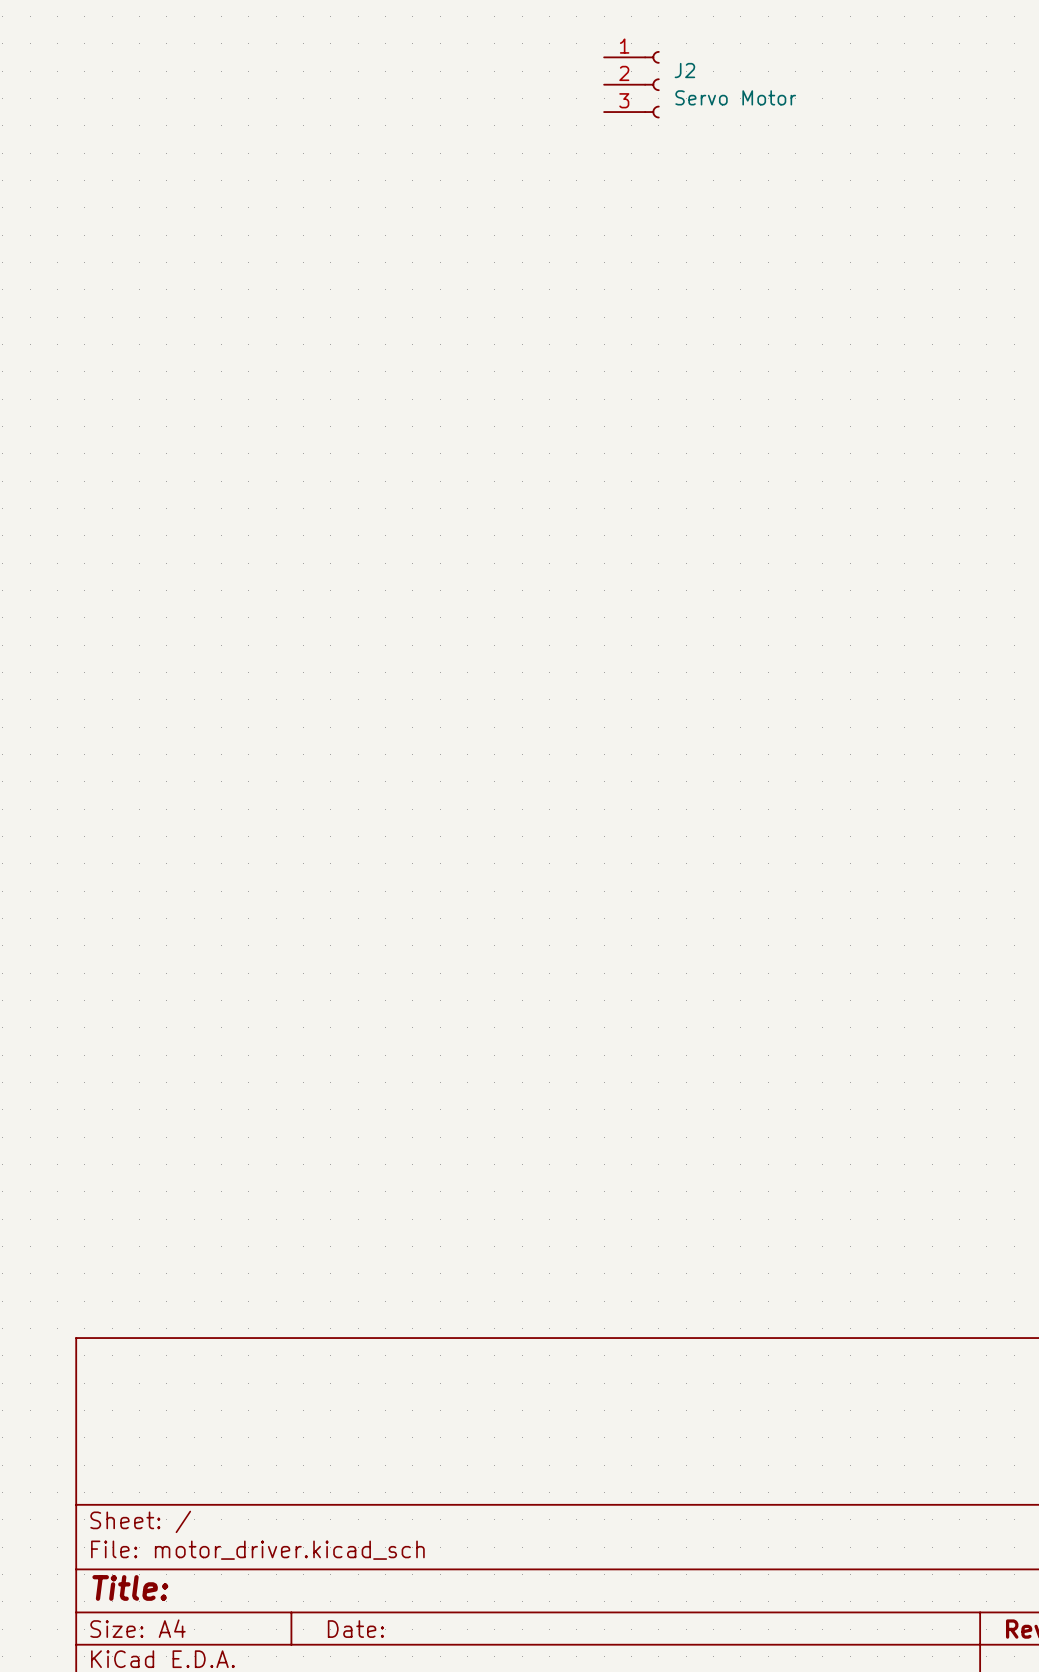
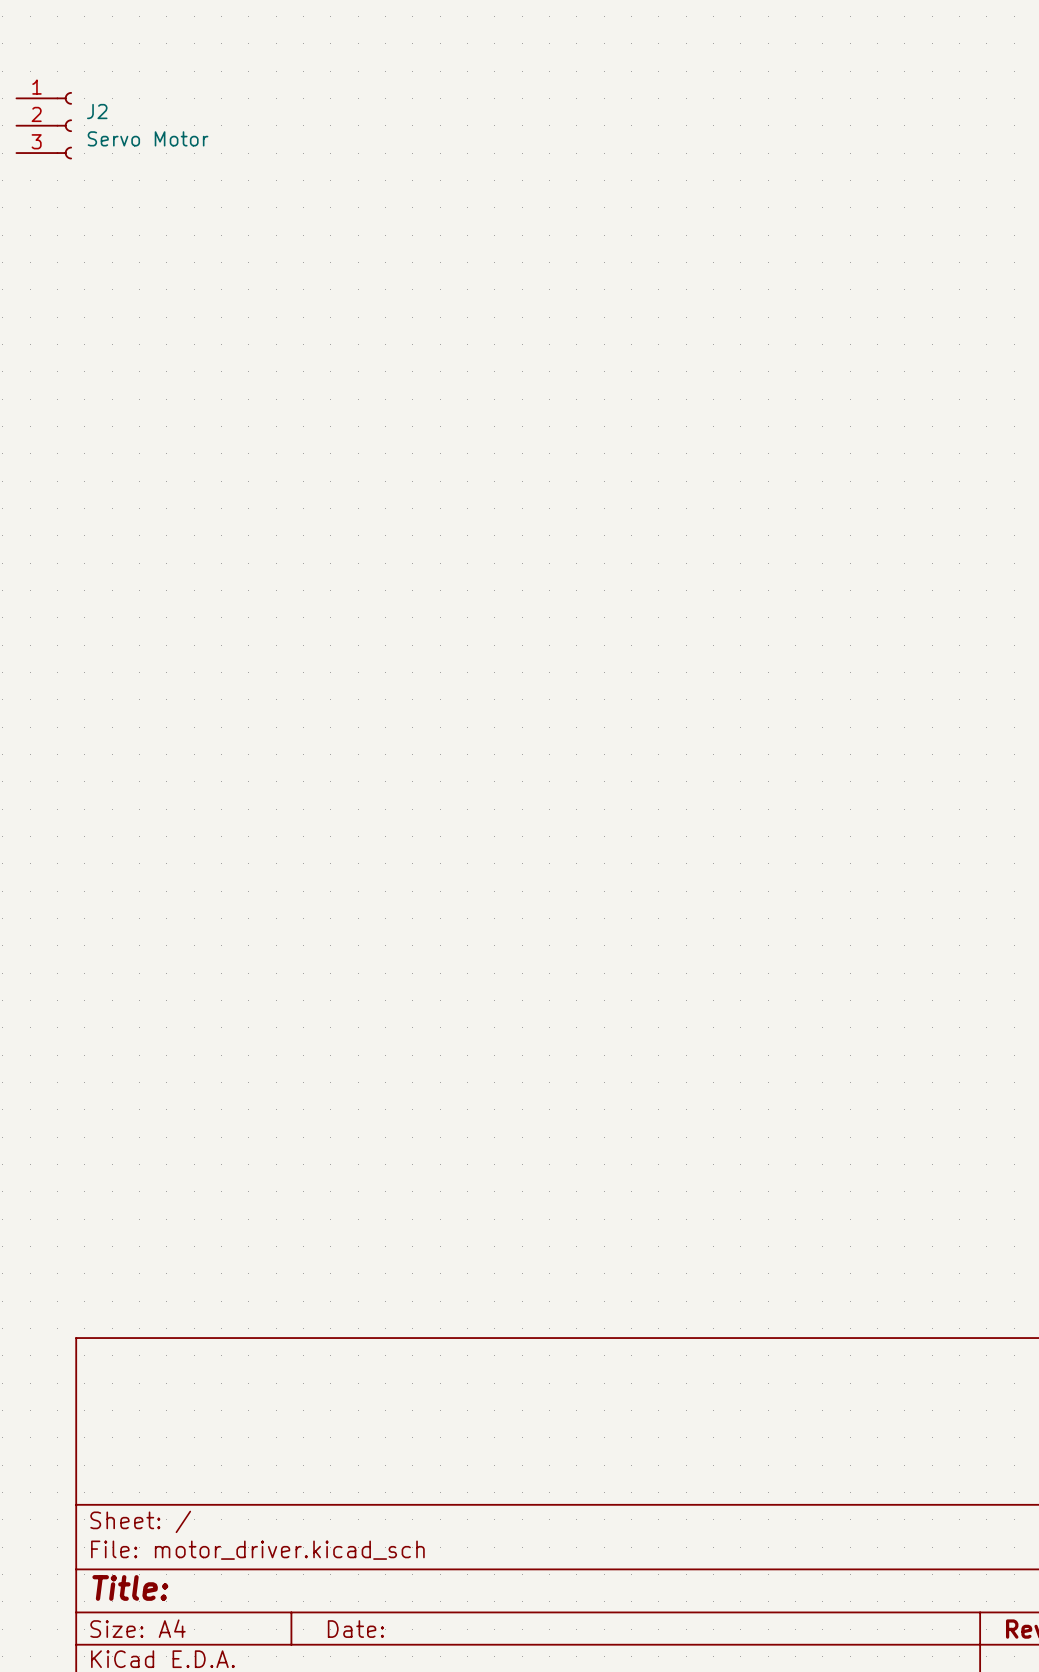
J2 position: (631, 84) -> (44, 125)

